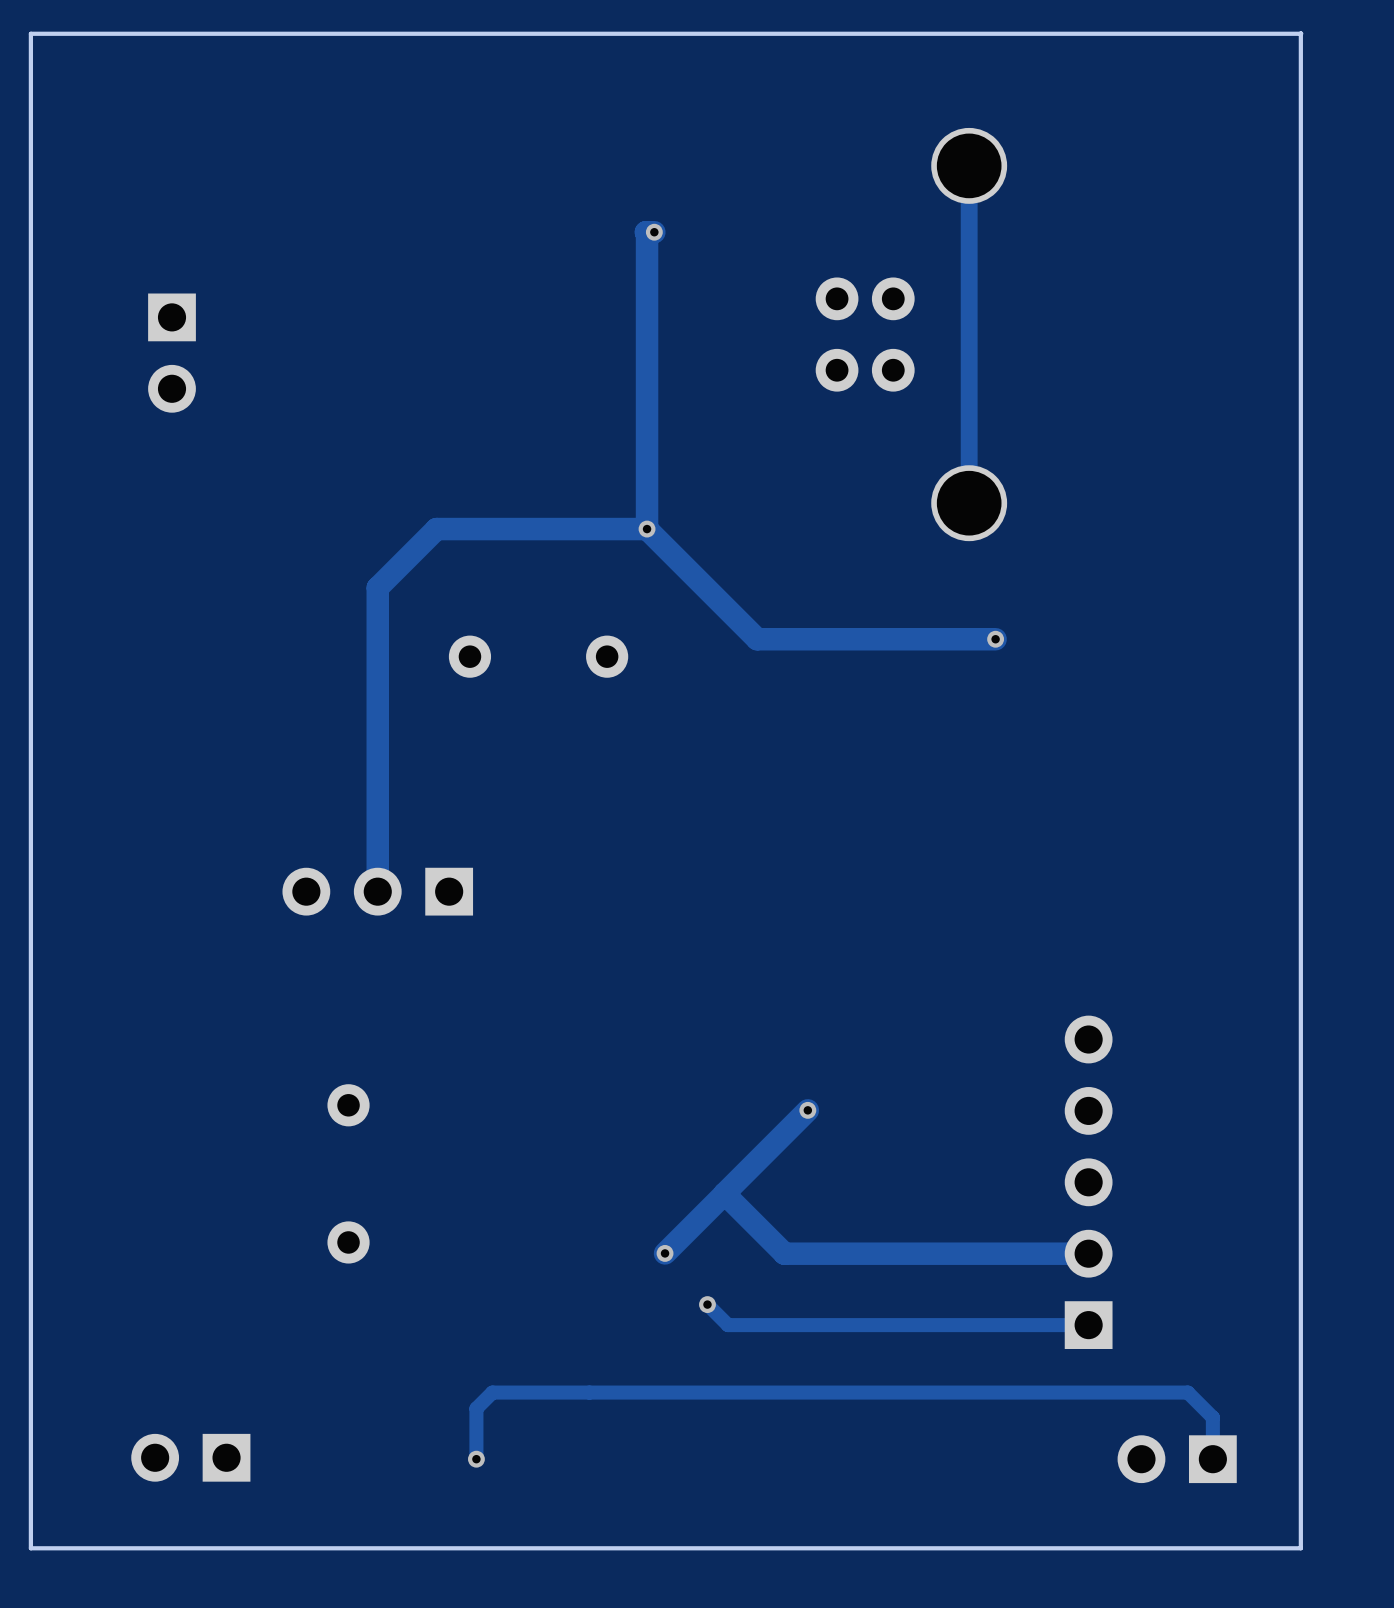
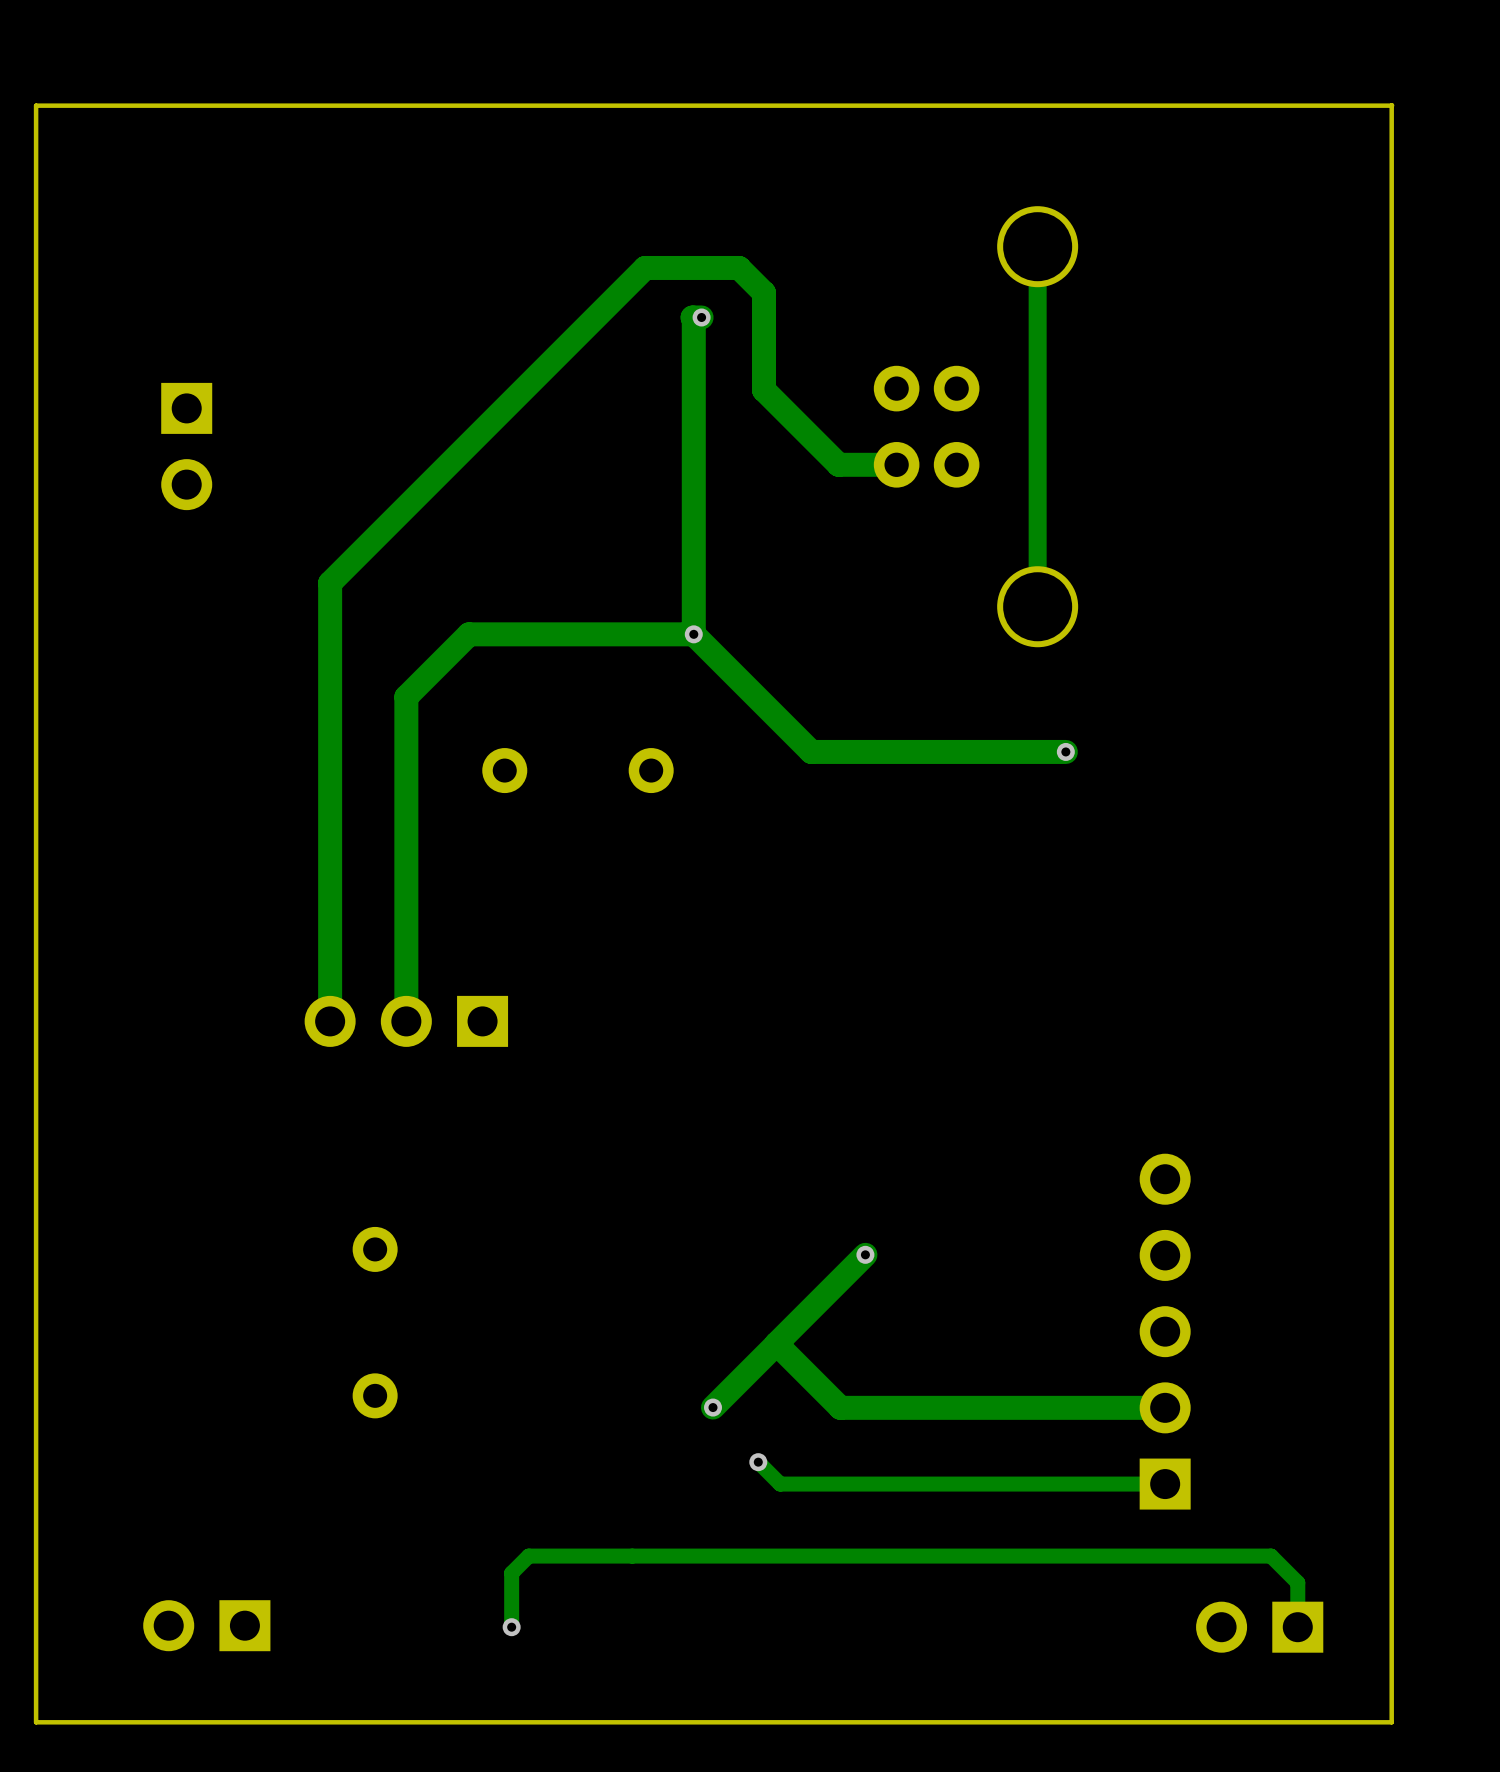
track: none -> (896, 464) (838, 464) (764, 390) (764, 292) (739, 267) (645, 267) (330, 583) (330, 1021)

